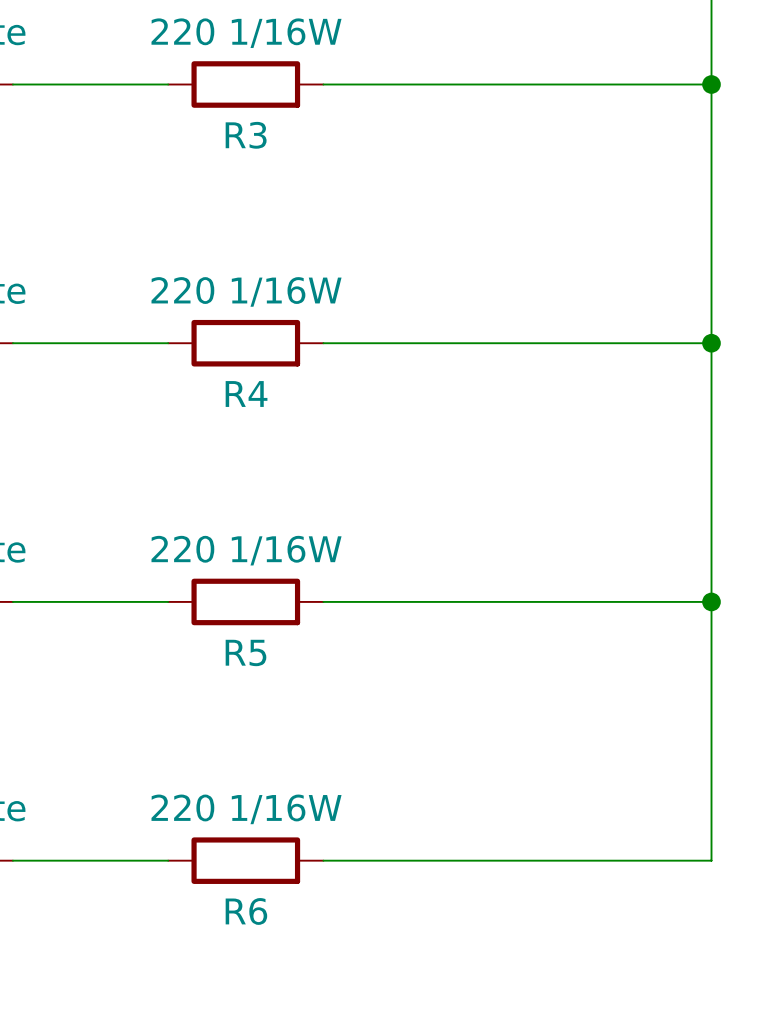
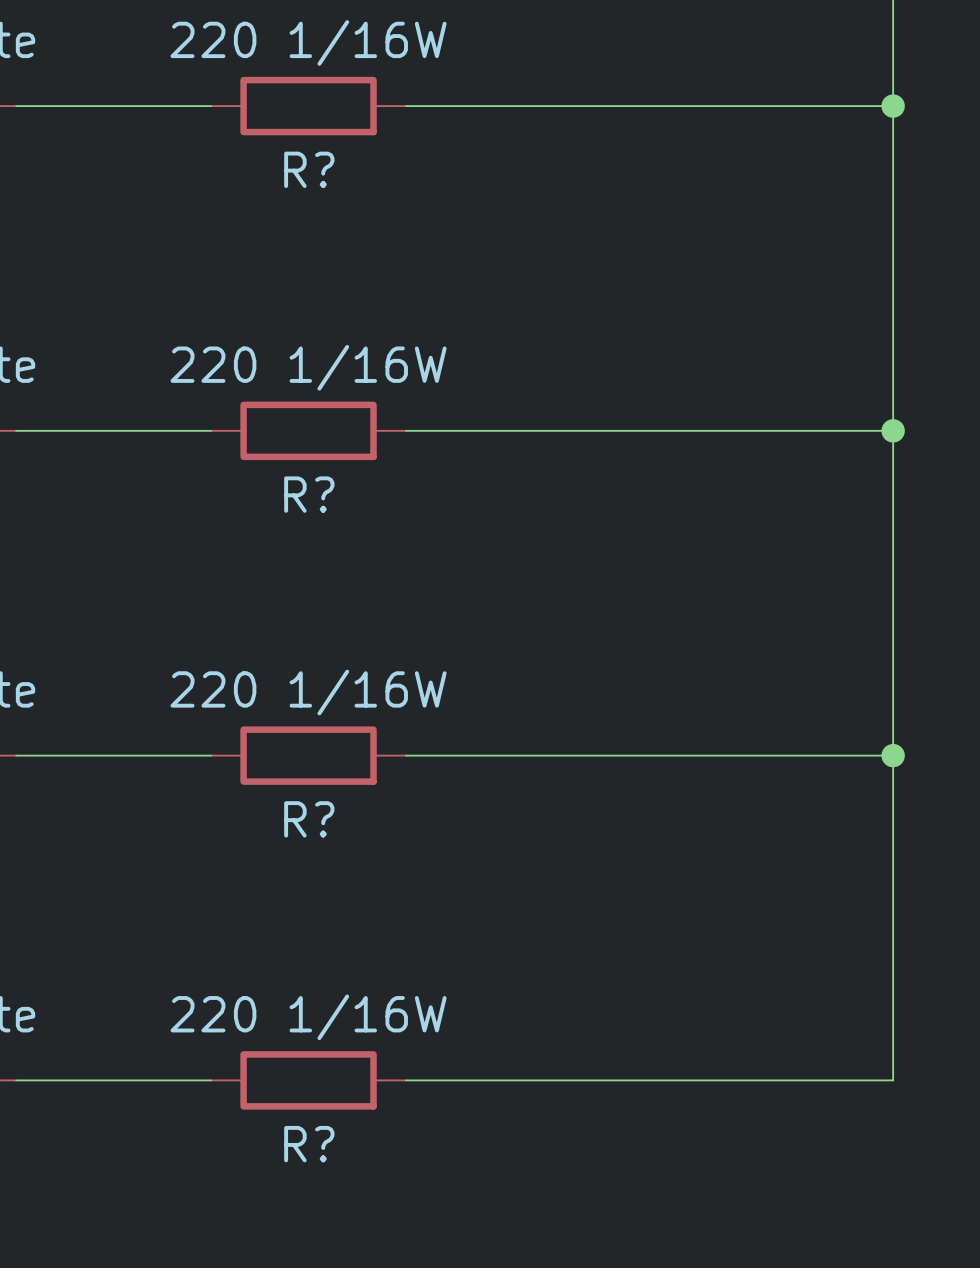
R3 name: R3 (246, 135) -> R? (309, 169)
R4 name: R4 (246, 394) -> R? (309, 494)
R5 name: R5 (245, 652) -> R? (309, 819)
R6 name: R6 (246, 911) -> R? (309, 1144)

